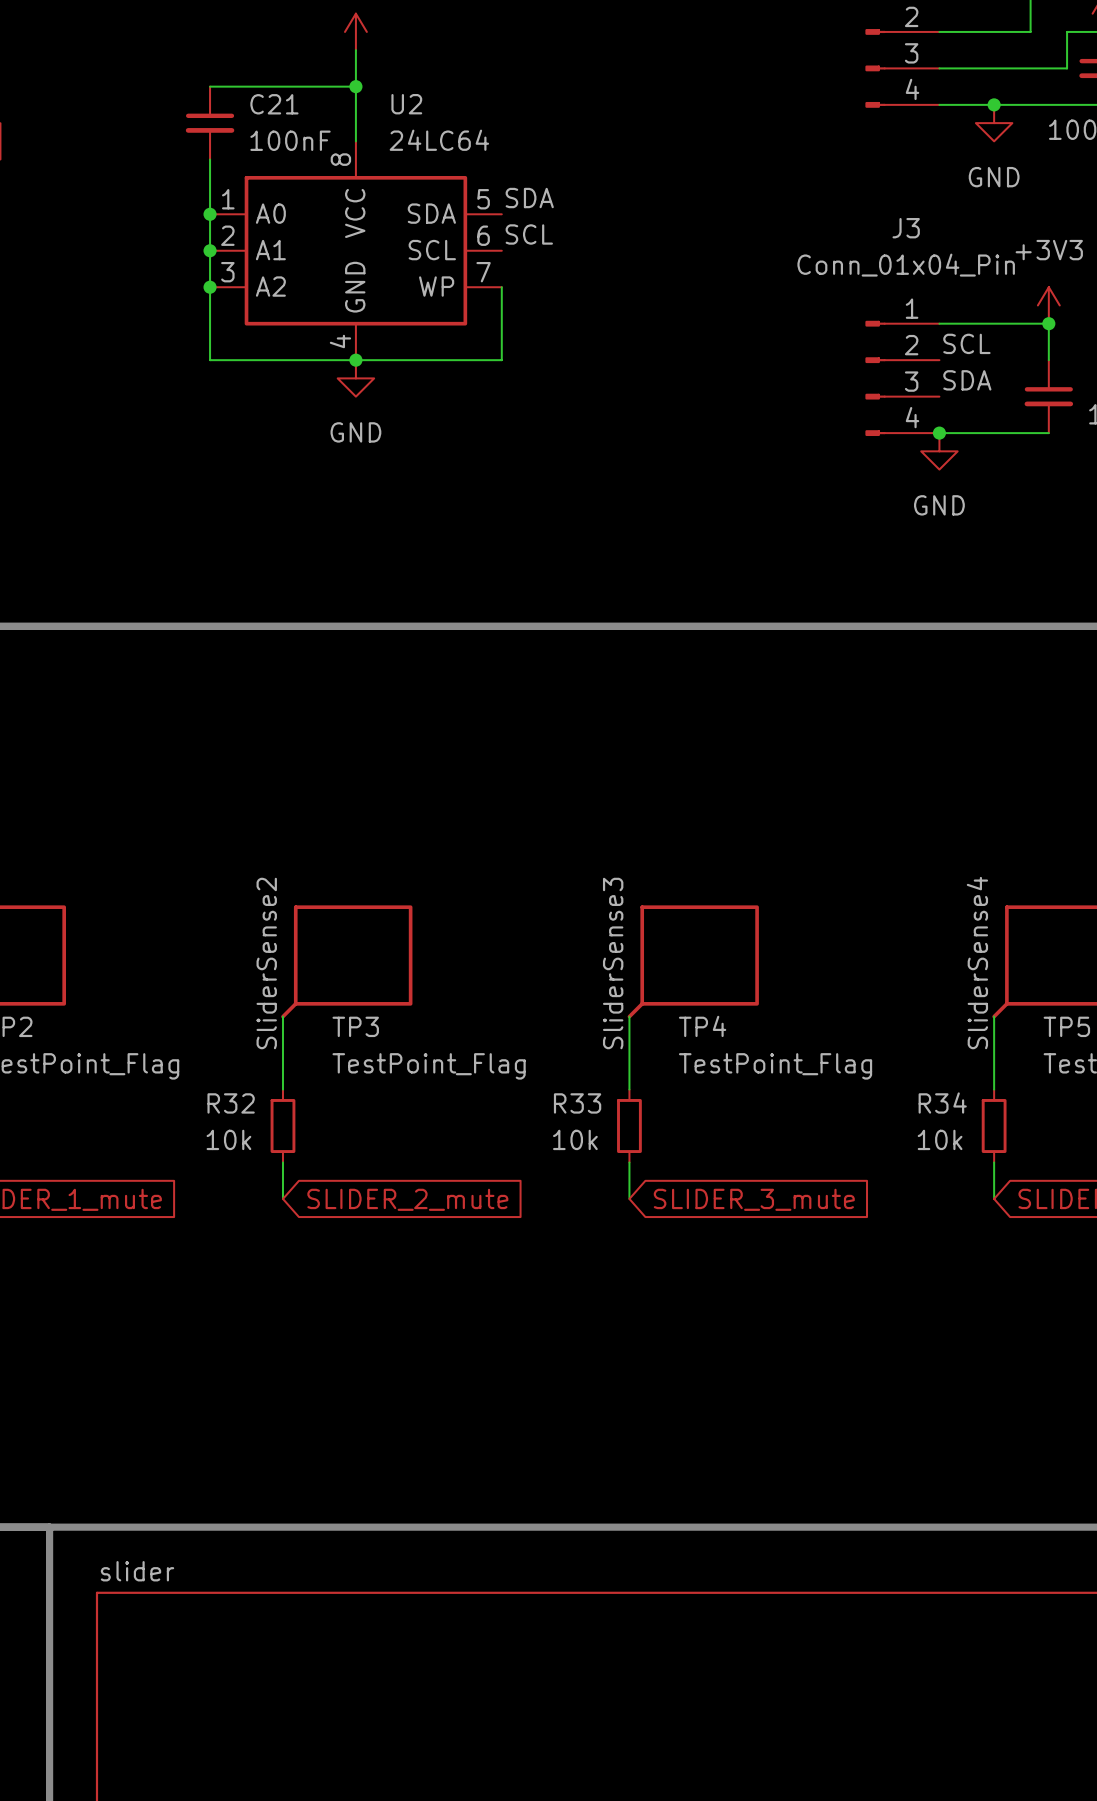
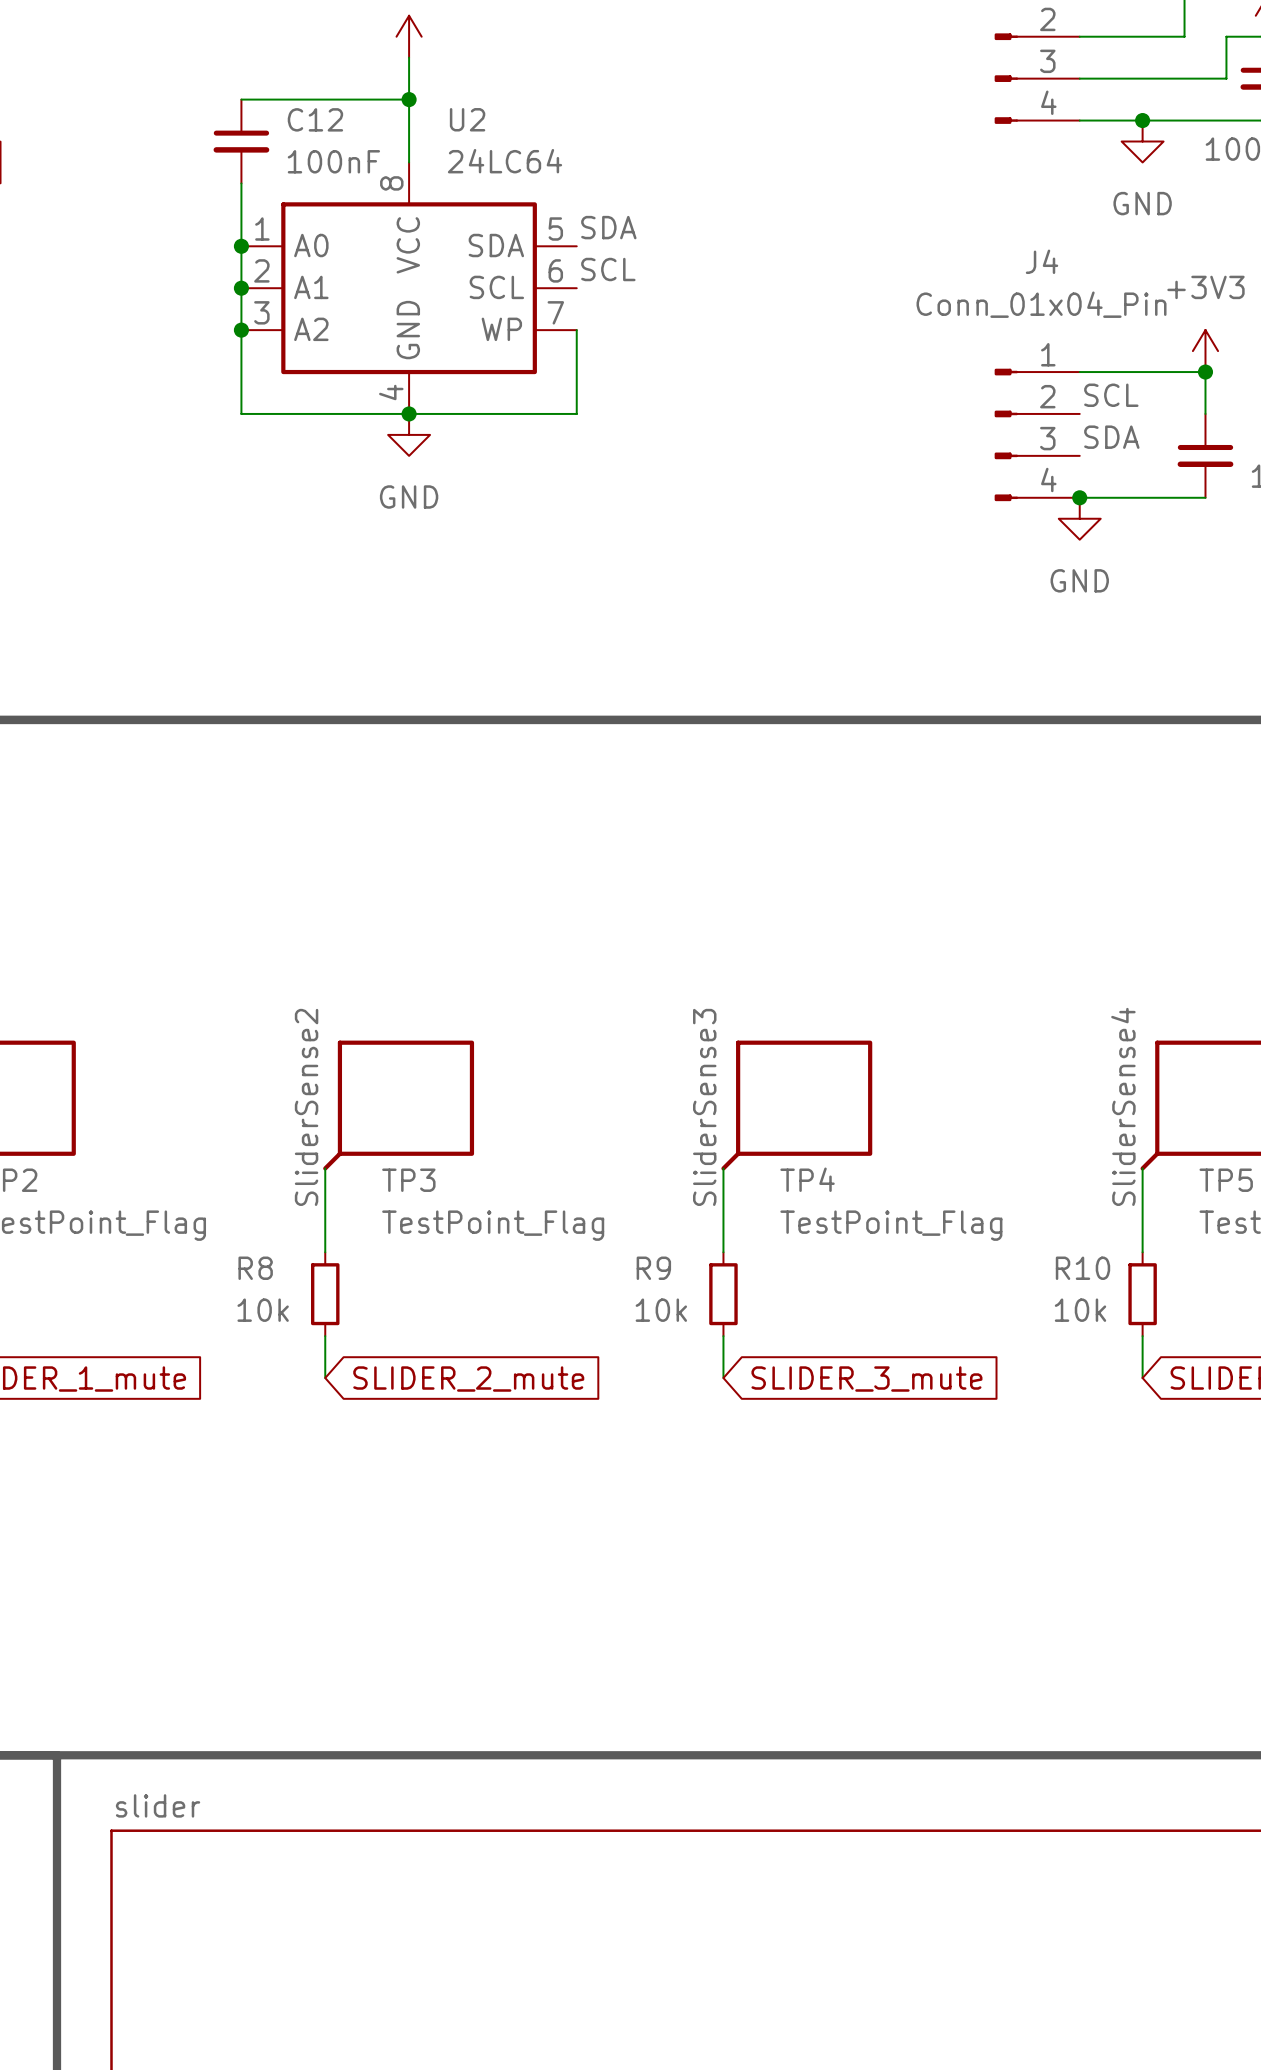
C21 name: C21 (274, 104) -> C12 (315, 119)
J3 name: J3 (906, 228) -> J4 (1042, 261)
R32 name: R32 (231, 1103) -> R8 (255, 1268)
R33 name: R33 (577, 1103) -> R9 (653, 1268)
R34 name: R34 (942, 1103) -> R10 (1082, 1268)

